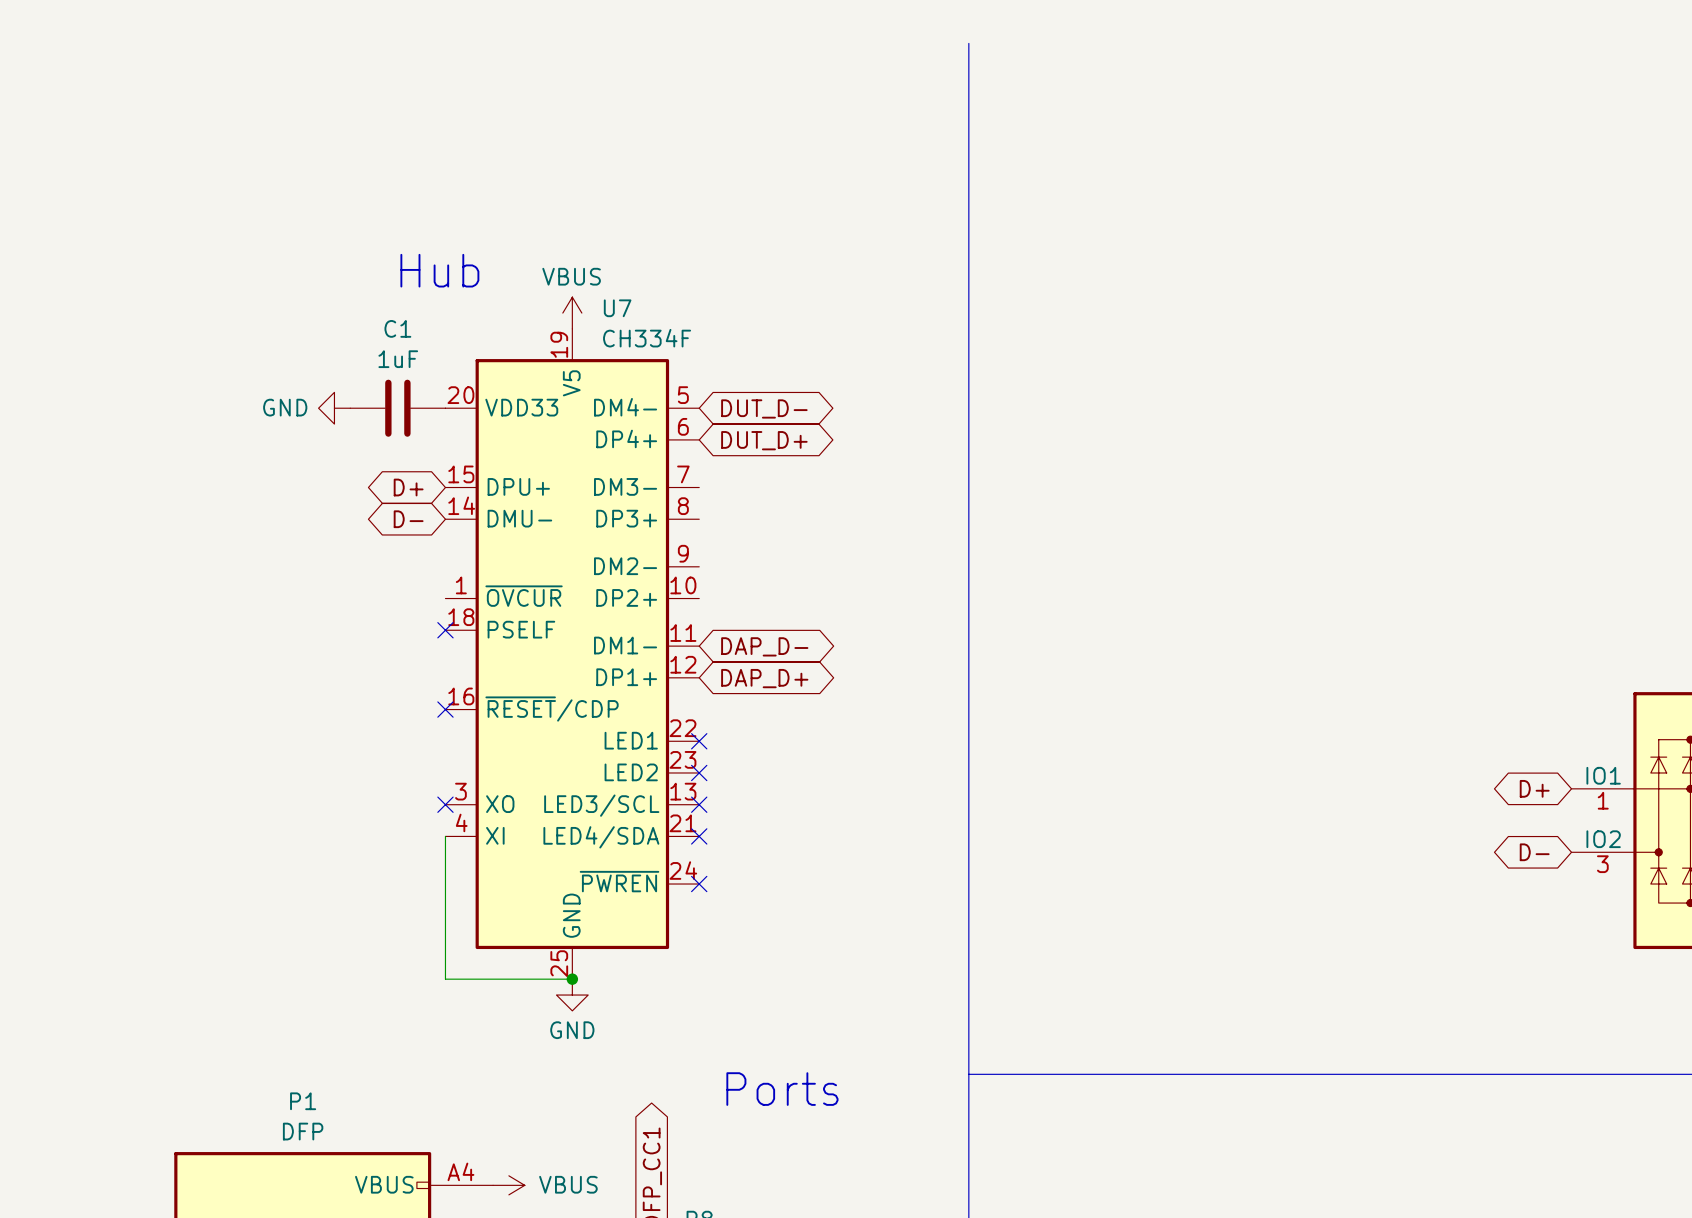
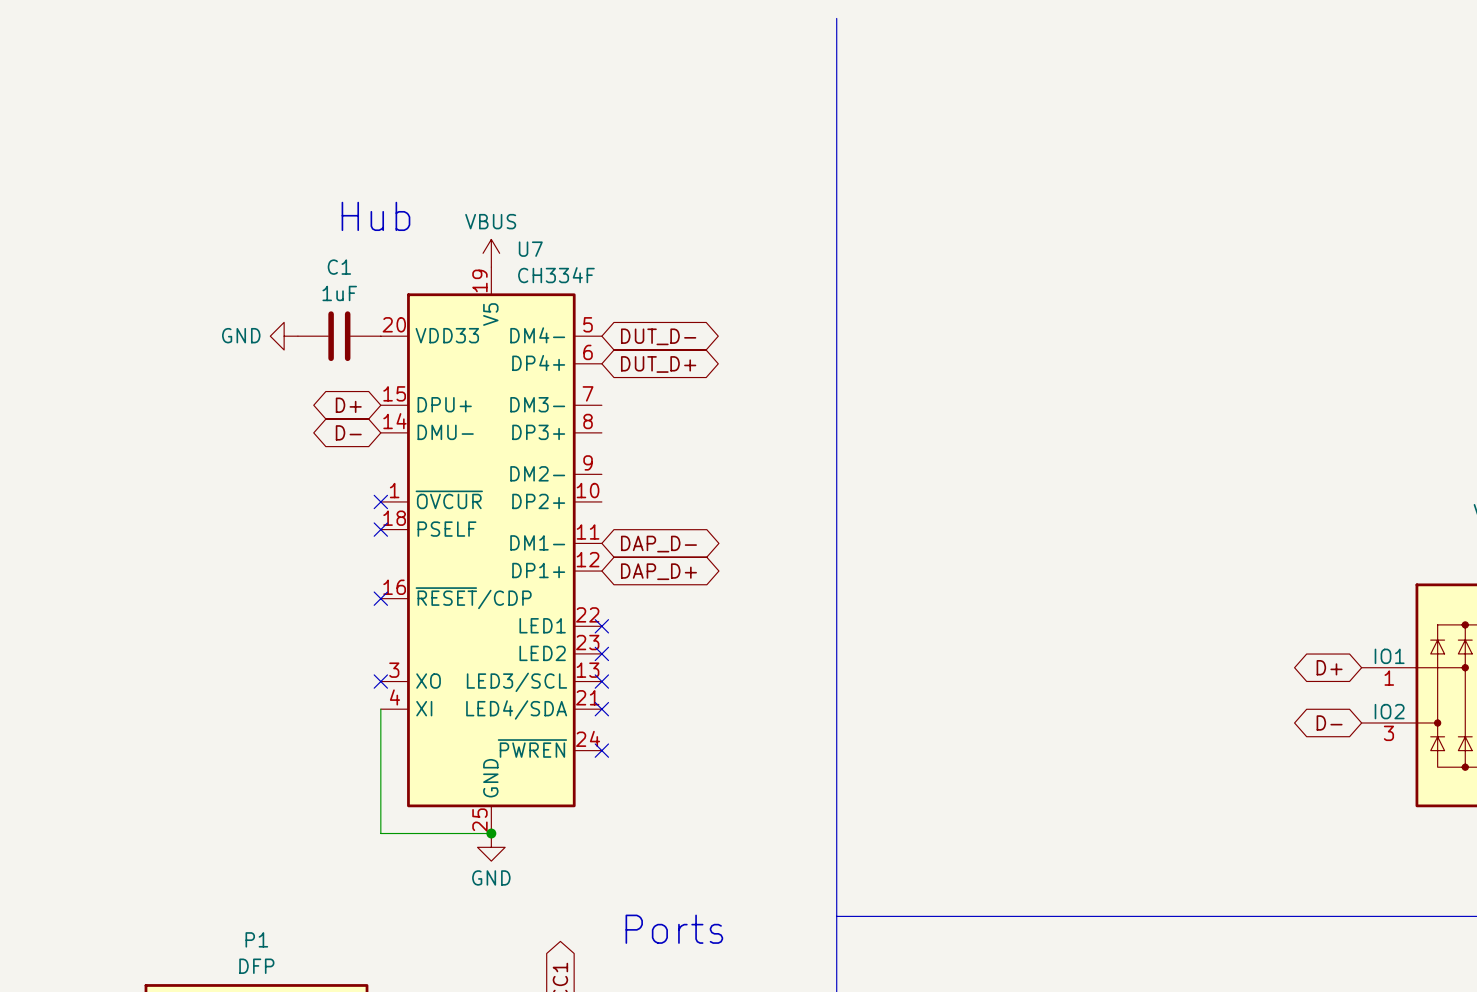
no-connect mark: none -> (380, 501)

